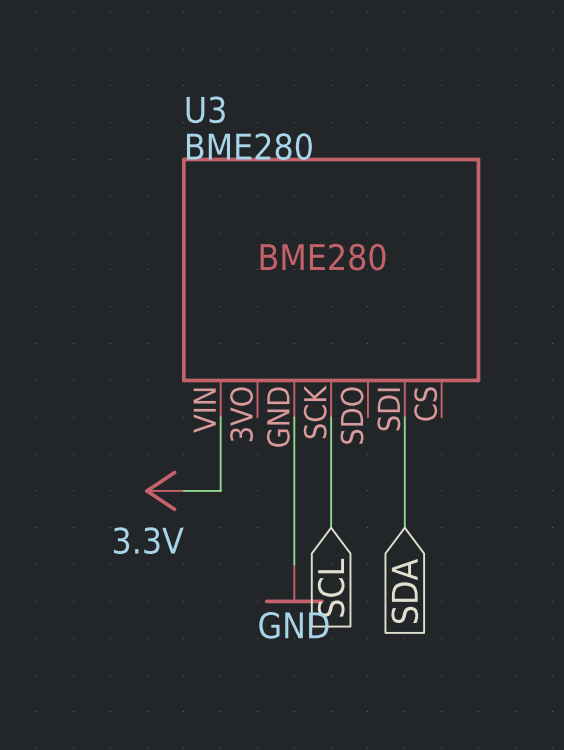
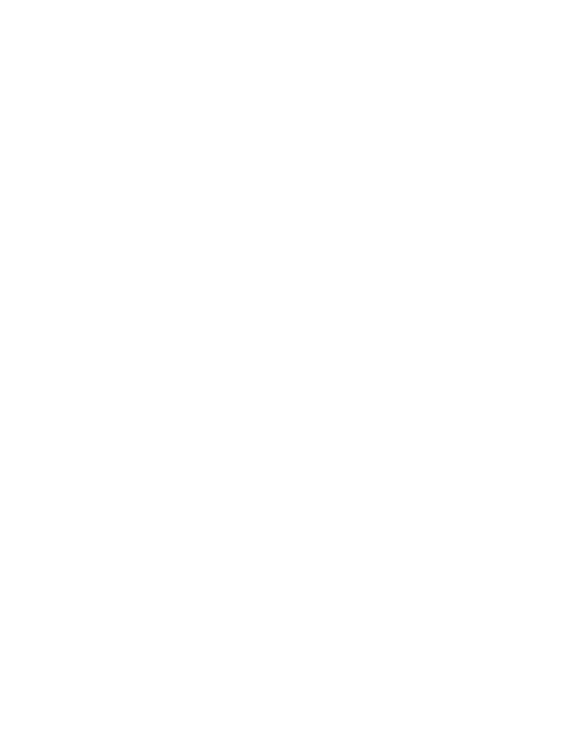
U3: BME280 (331, 287) -> none
wire: (220, 417) (220, 490) (183, 490) -> none
wire: (294, 417) (294, 564) -> none
wire: (331, 417) (331, 527) -> none
wire: (404, 417) (404, 527) -> none
power symbol: 3.3V (164, 490) -> none
power symbol: GND (294, 583) -> none
global label: SCL (331, 587) -> none
global label: SDA (404, 591) -> none

